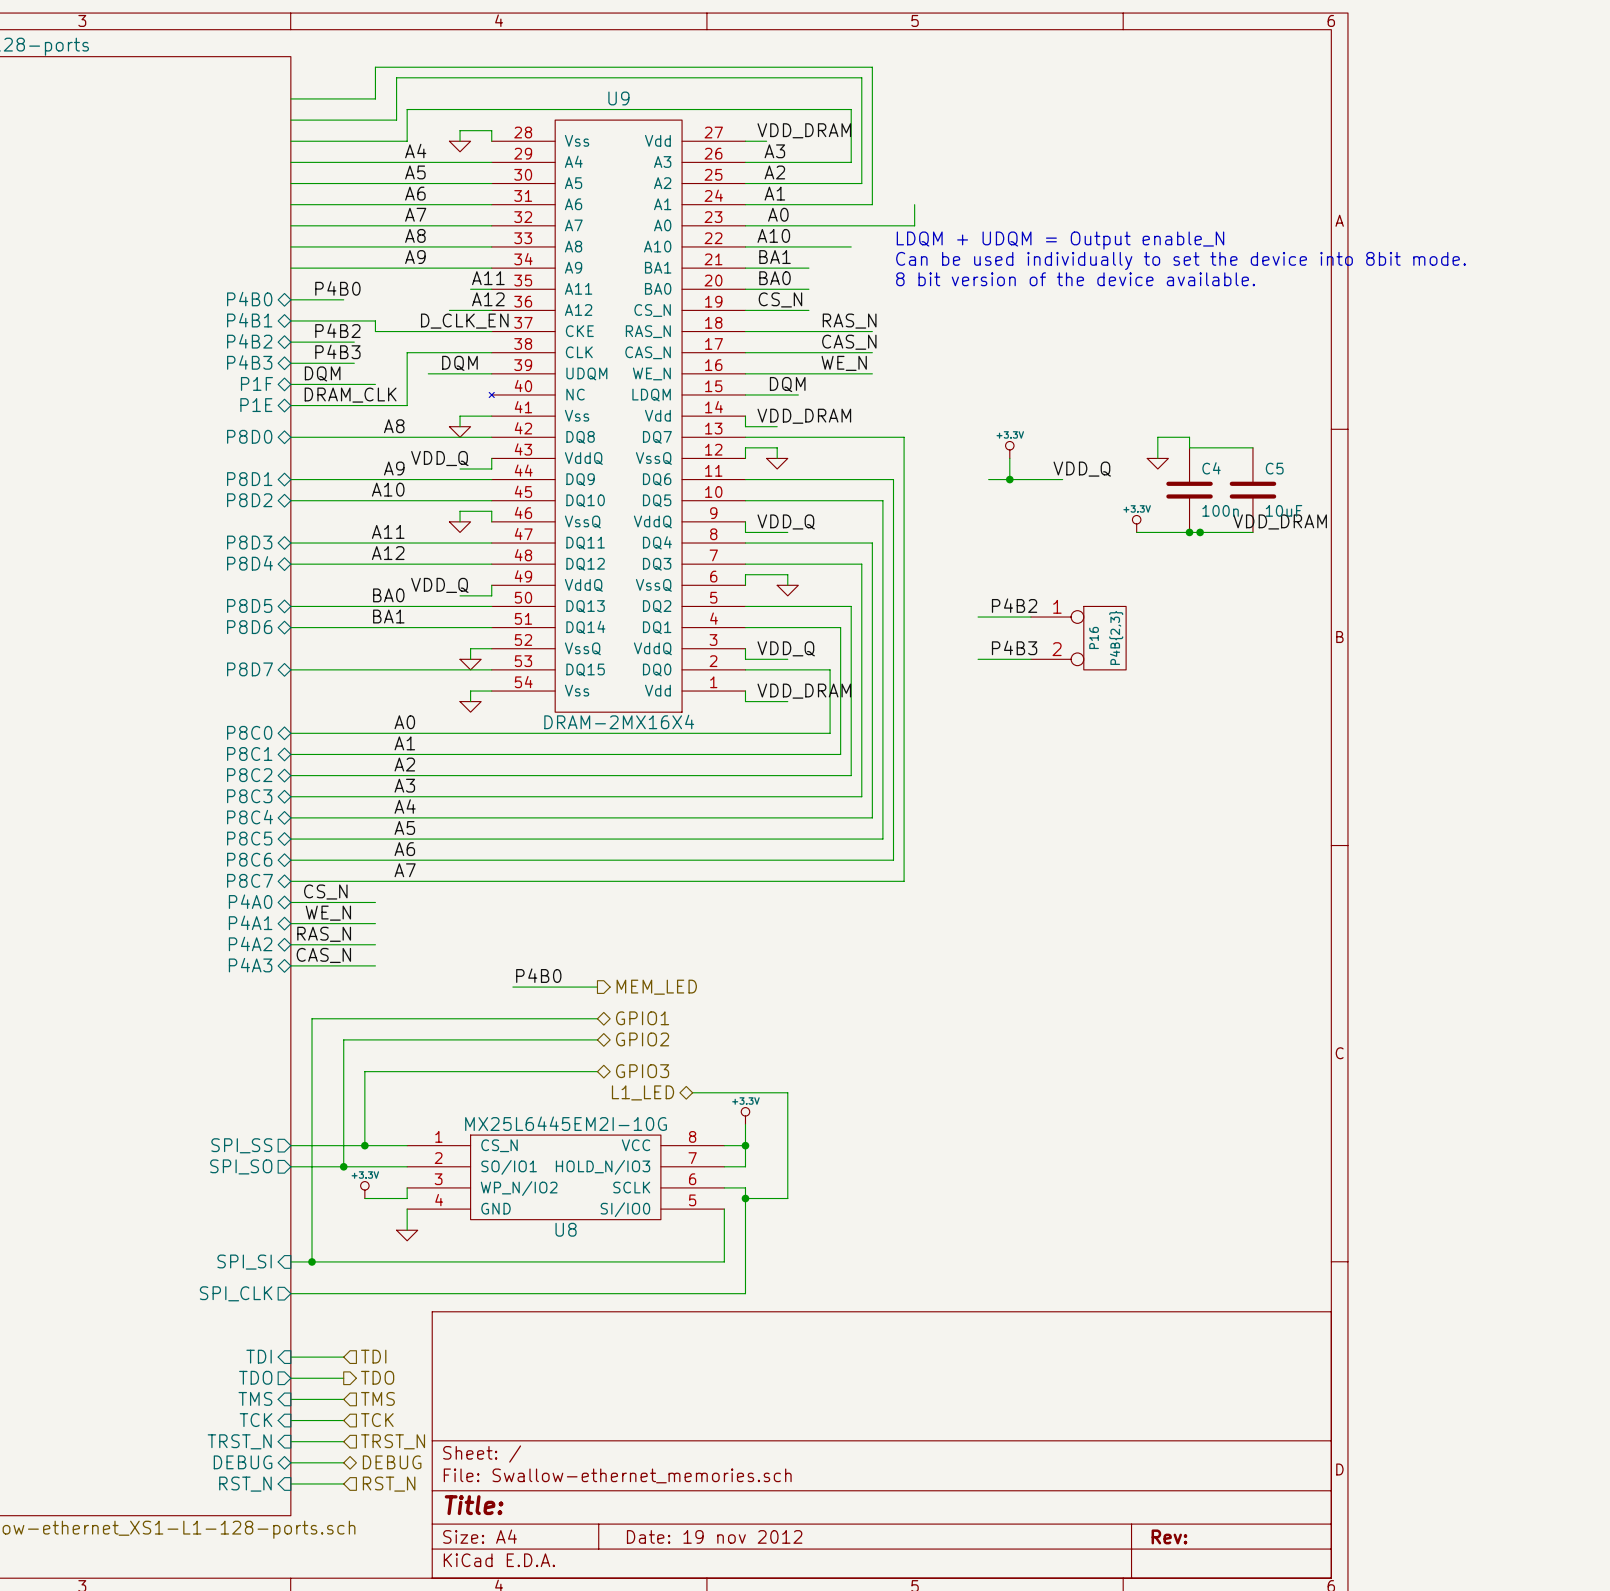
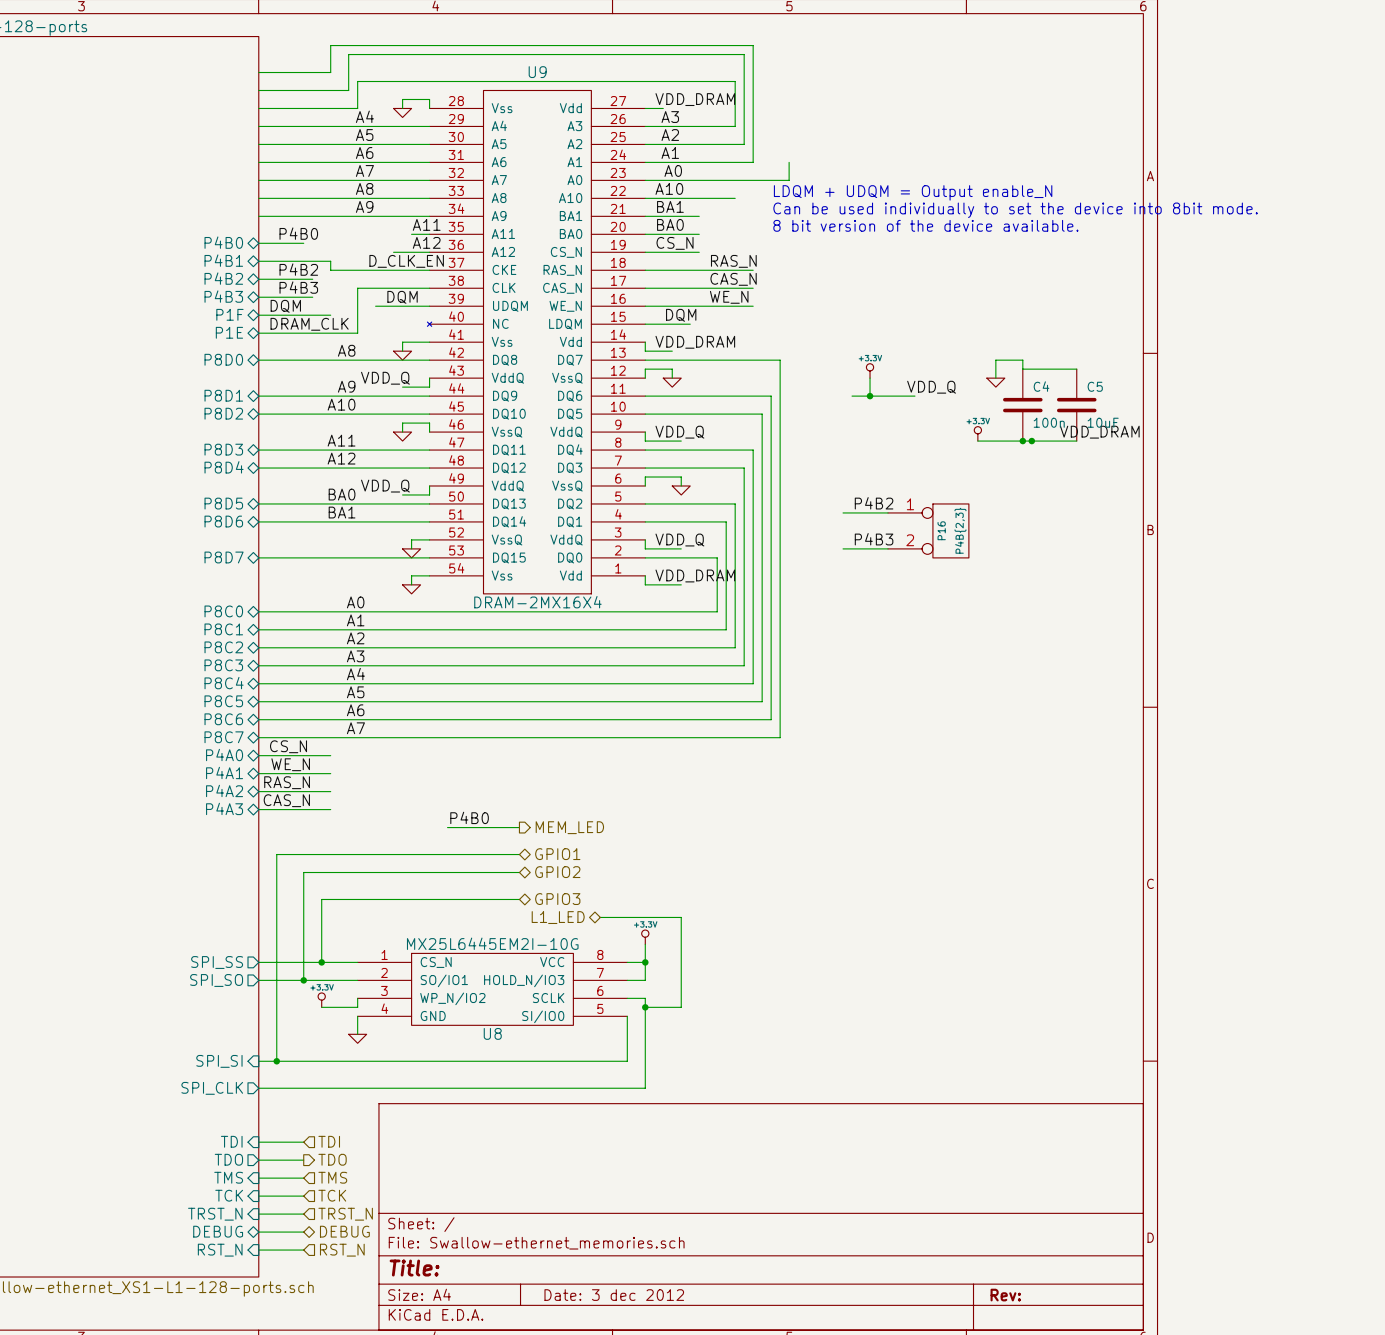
title block: Date: 19 nov 2012 (714, 1536) -> Date: 3 dec 2012 (614, 1295)

